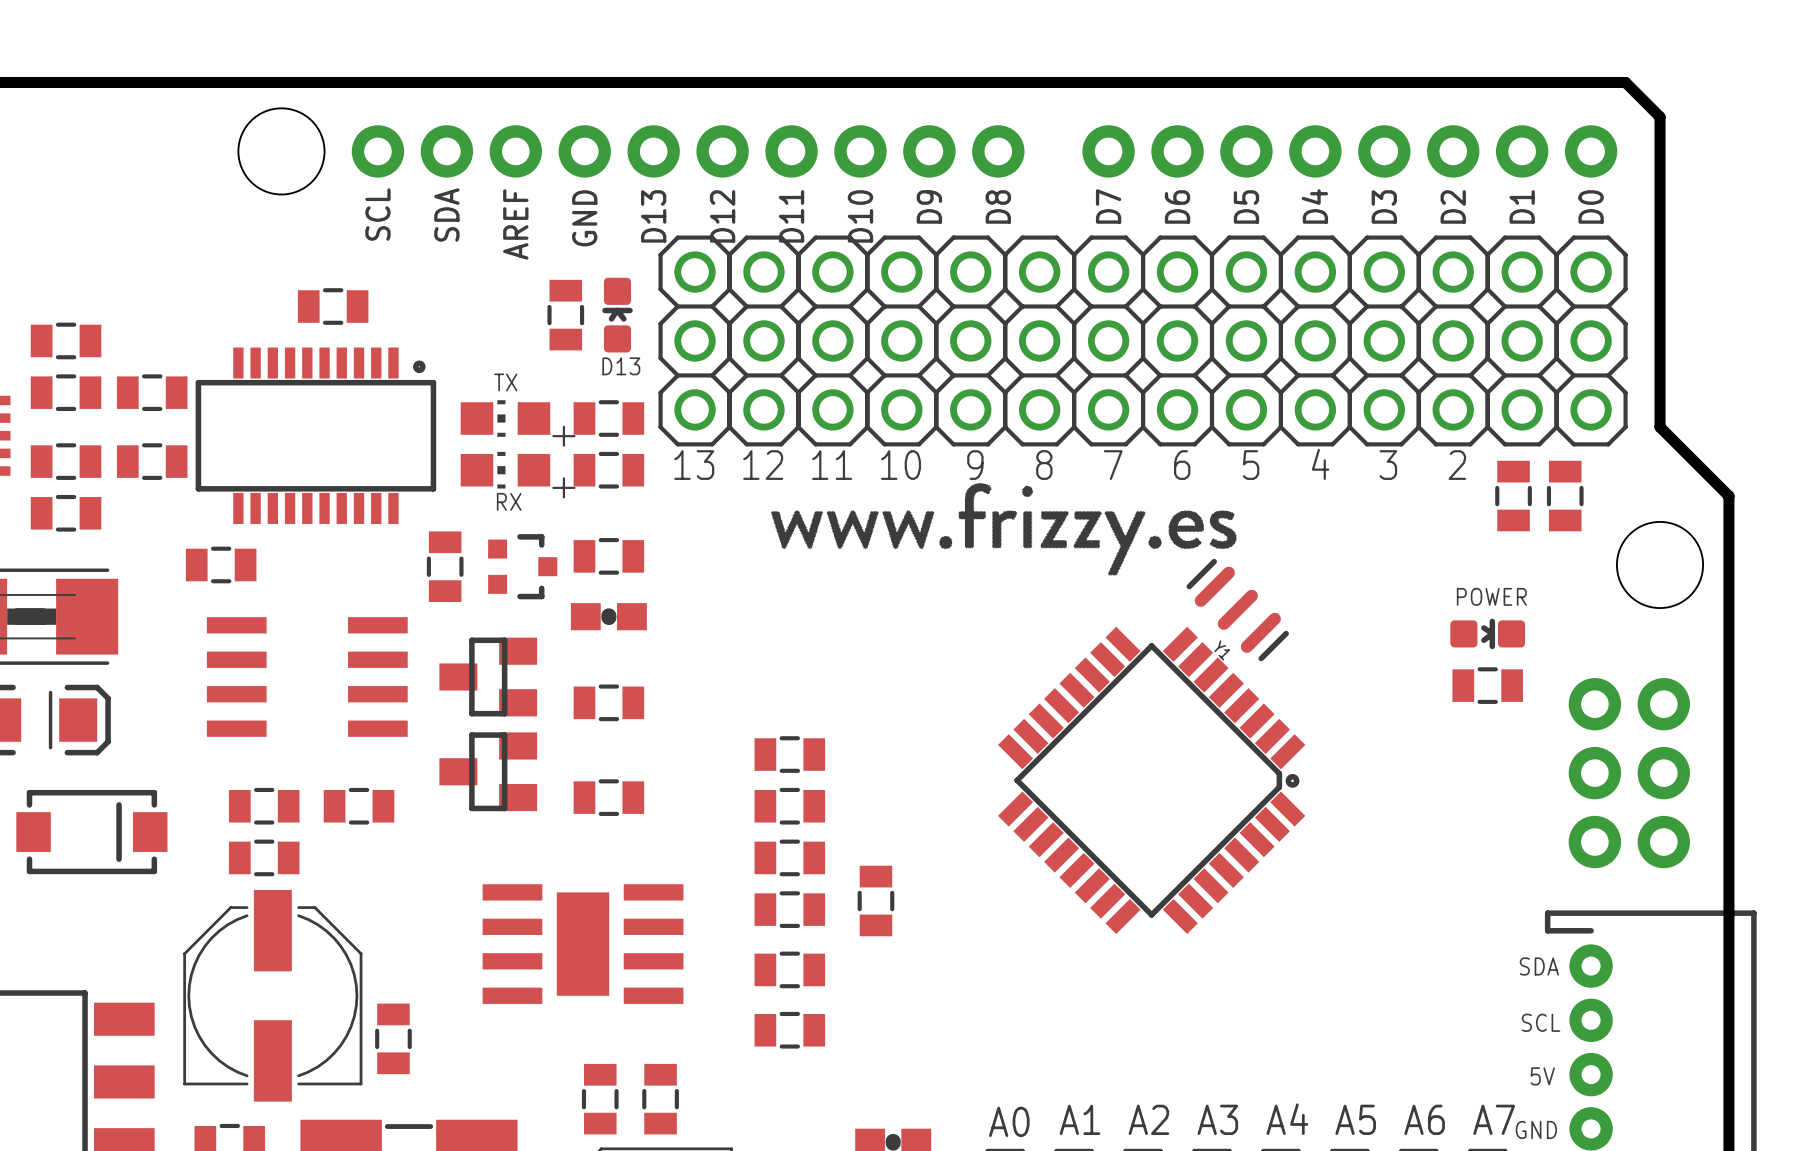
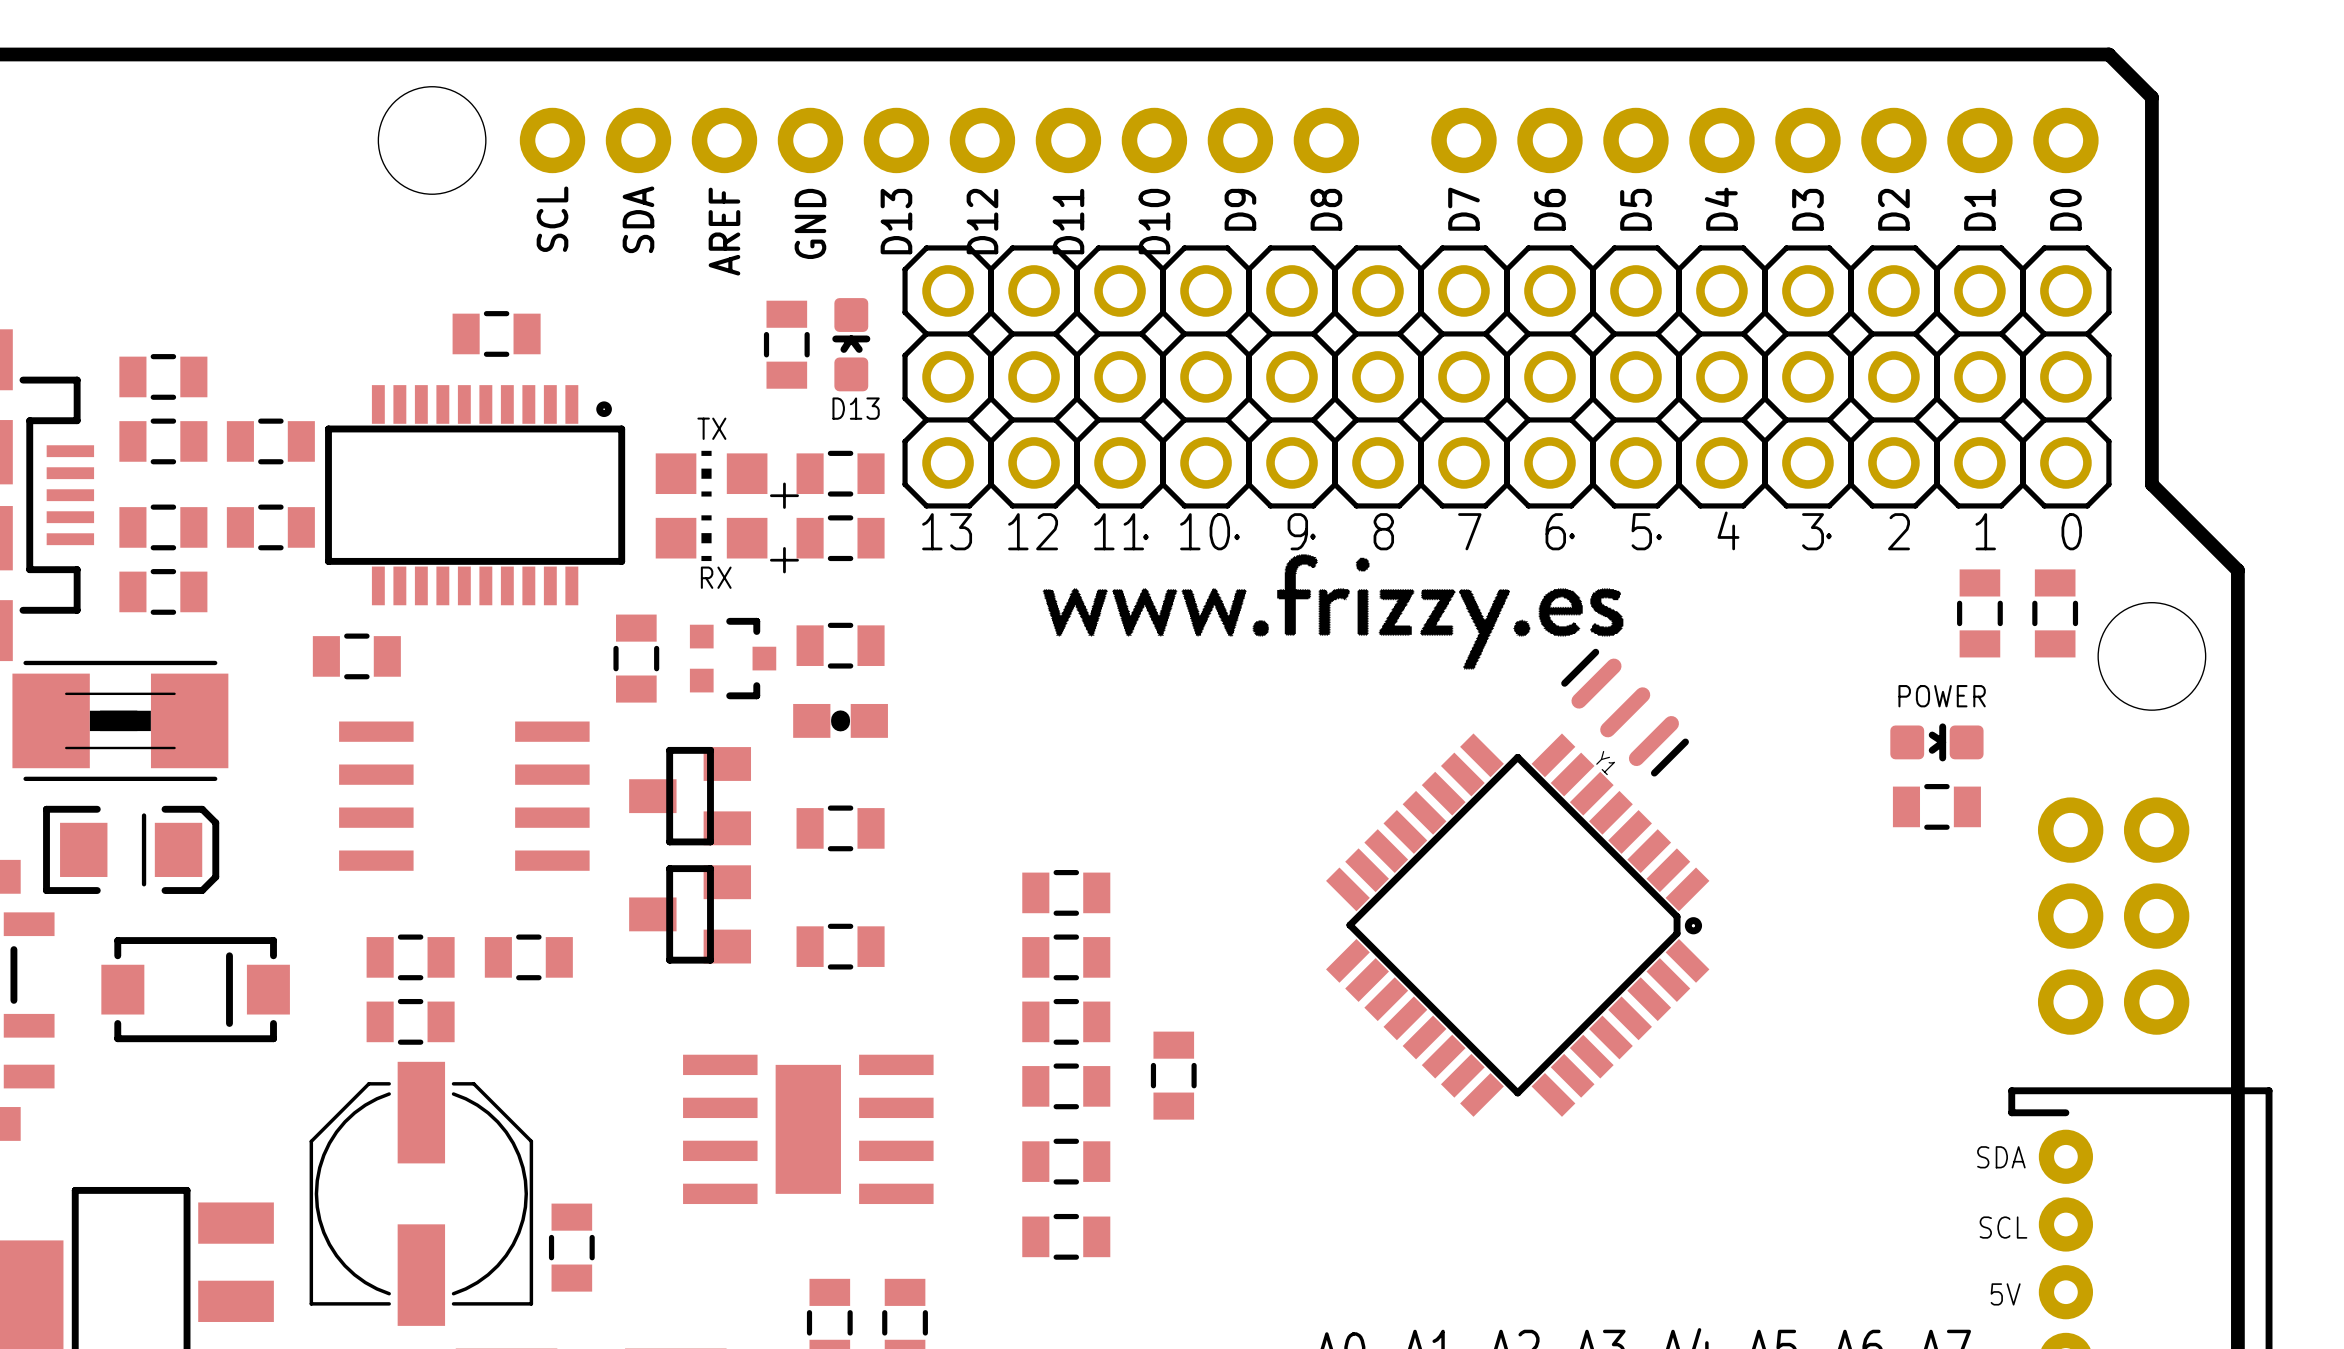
text: none -> 1 (1985, 531)
text: none -> 0 (2071, 531)
text: none -> . (1312, 536)
text: none -> . (1572, 536)
text: none -> . (1828, 536)
text: none -> . (1145, 537)
text: none -> . (1237, 537)
text: none -> . (1659, 537)
part: (1513, 496) -> none
part: (1565, 496) -> none
part: none -> (1979, 613)
part: none -> (2055, 613)

